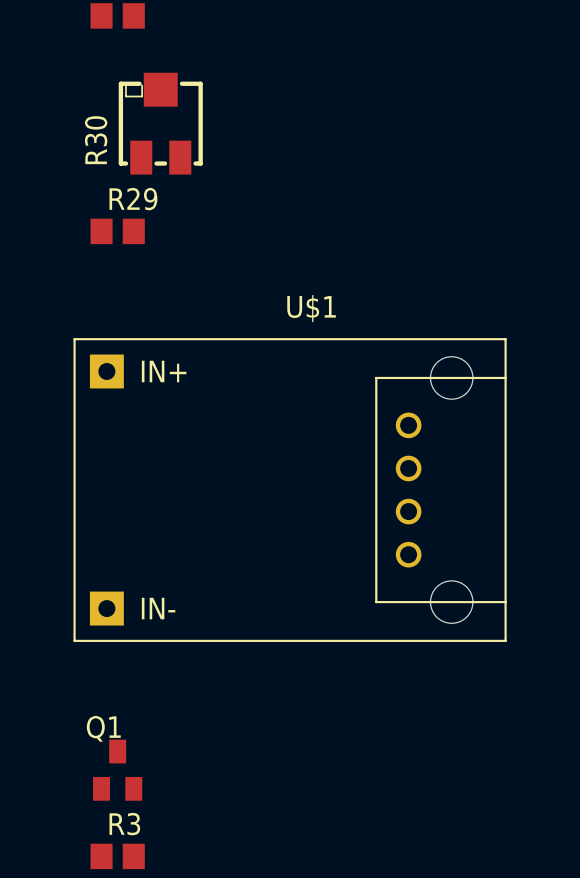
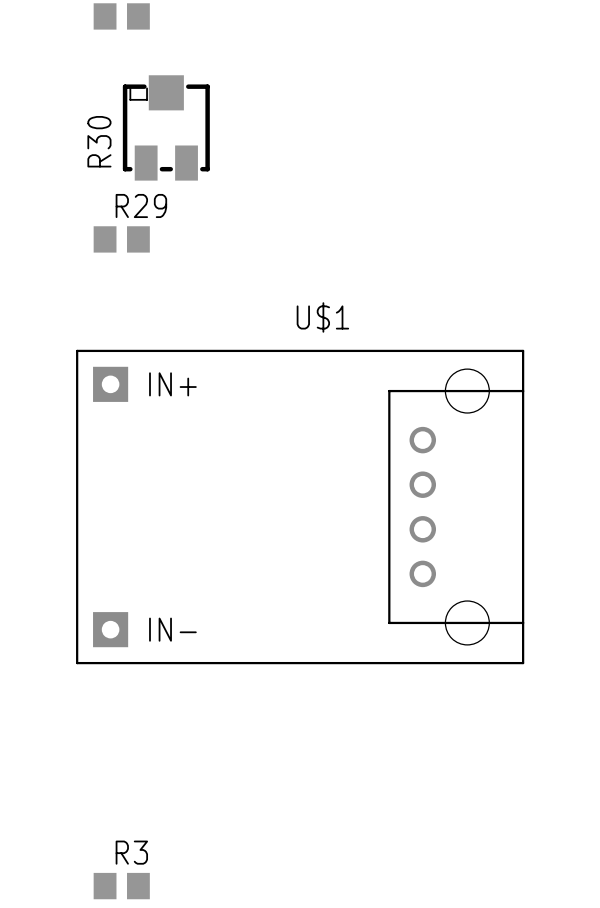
Q1: (117, 770) -> none

